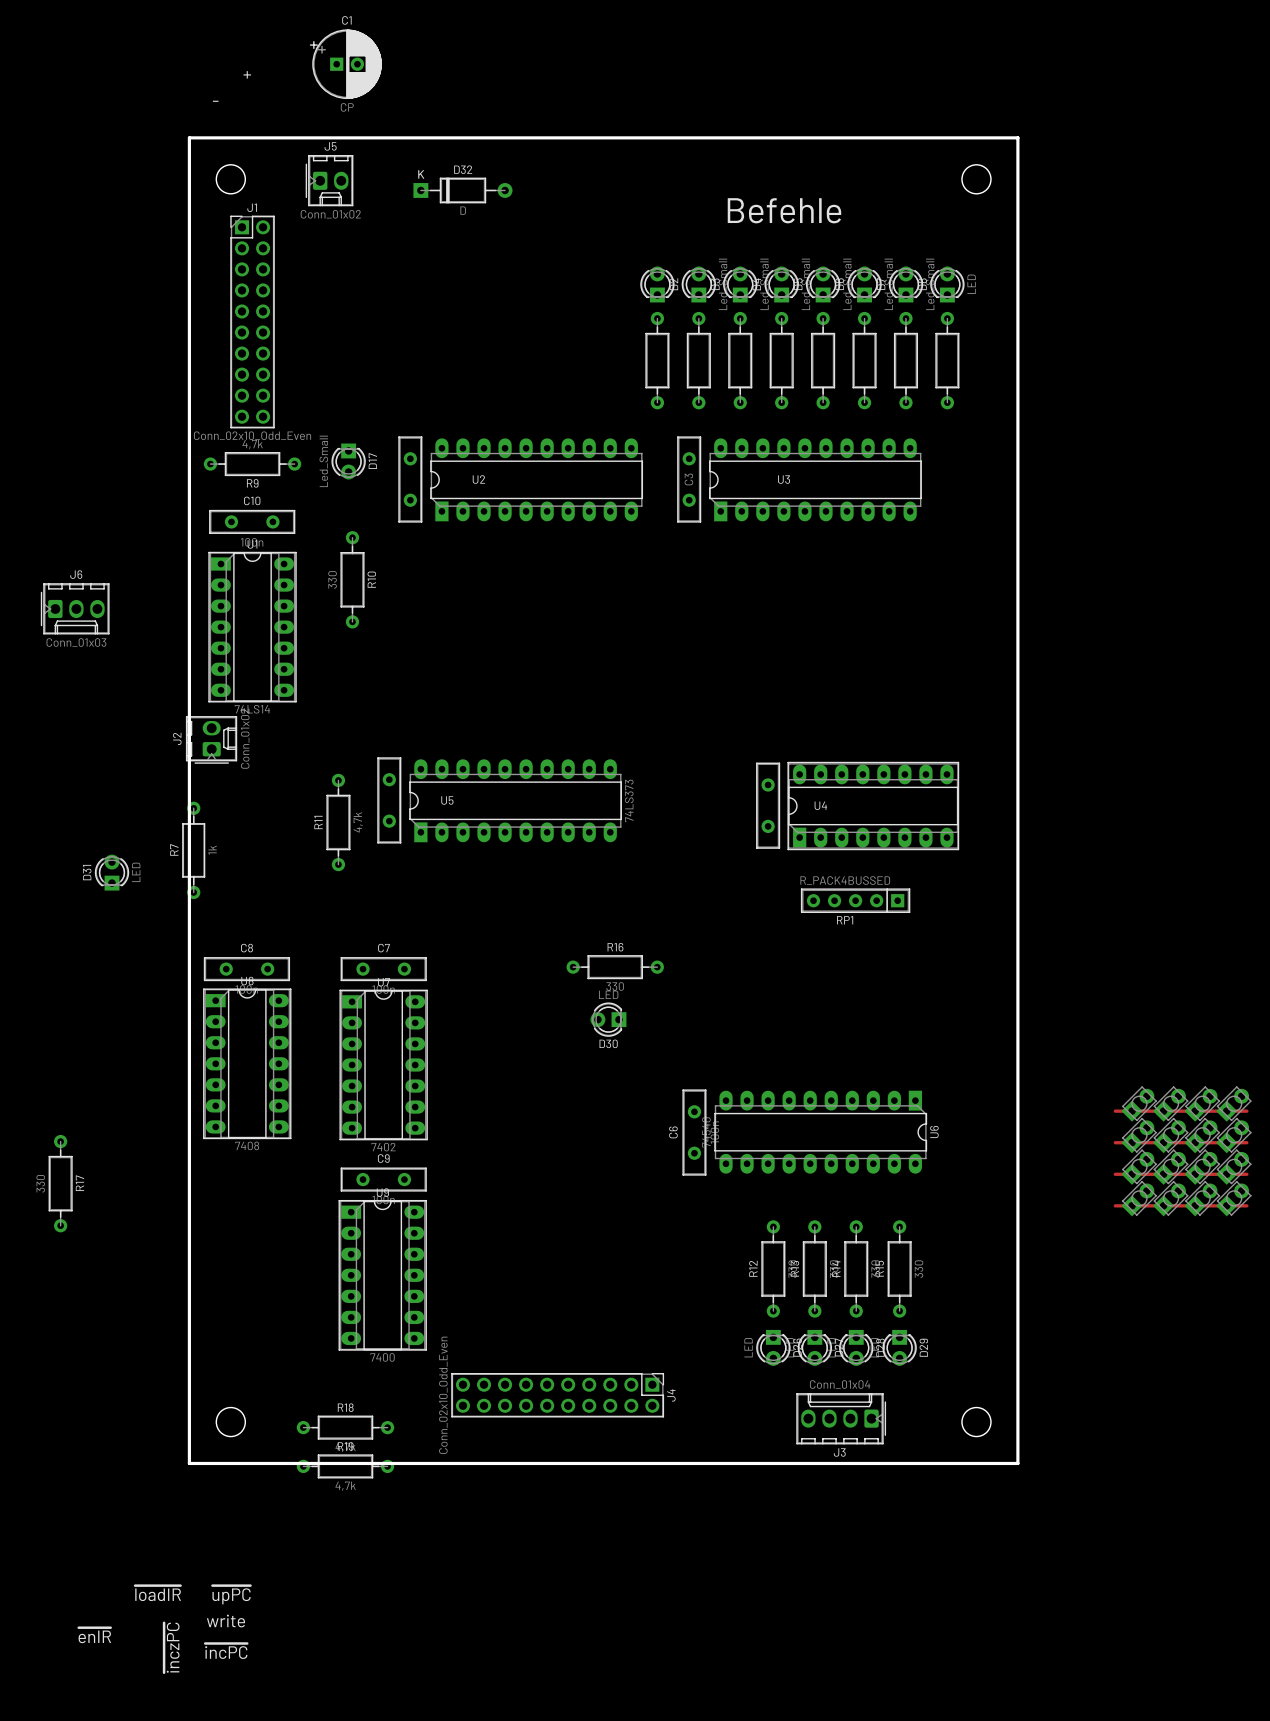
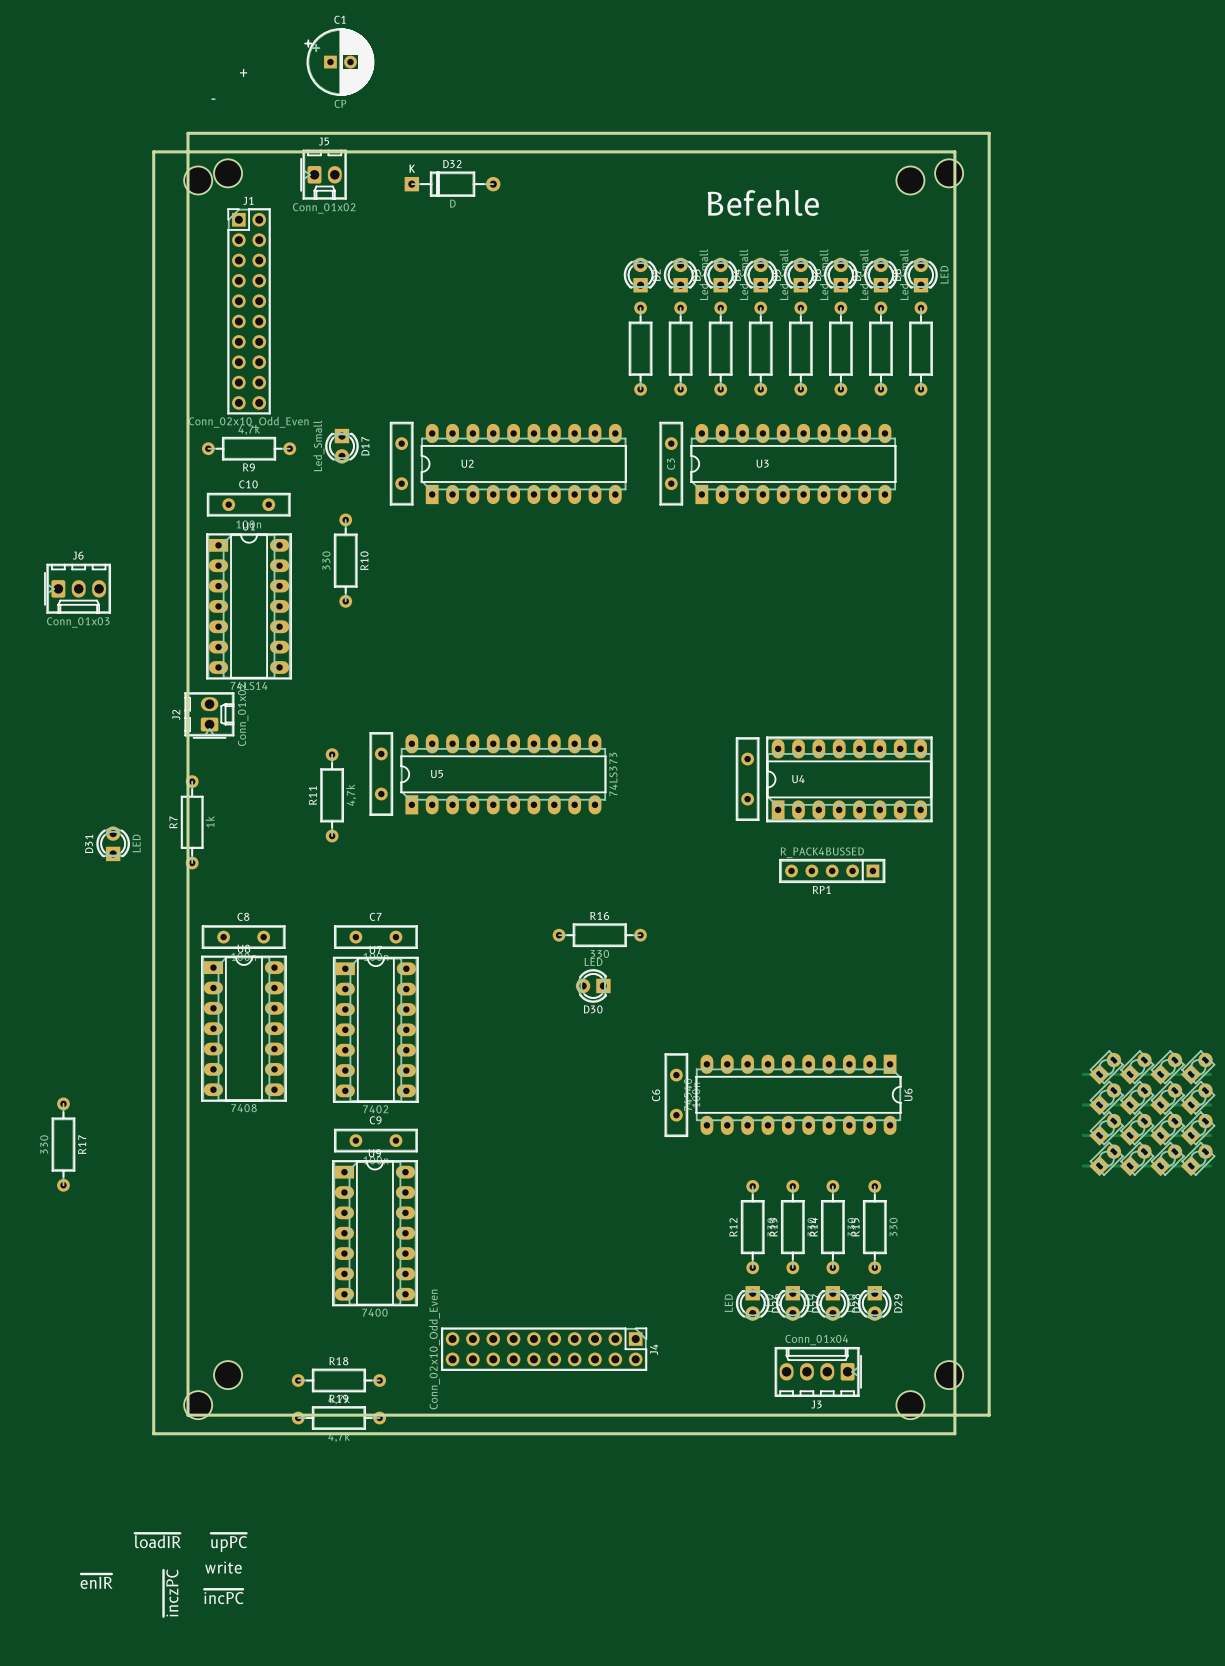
part: none -> (554, 792)

